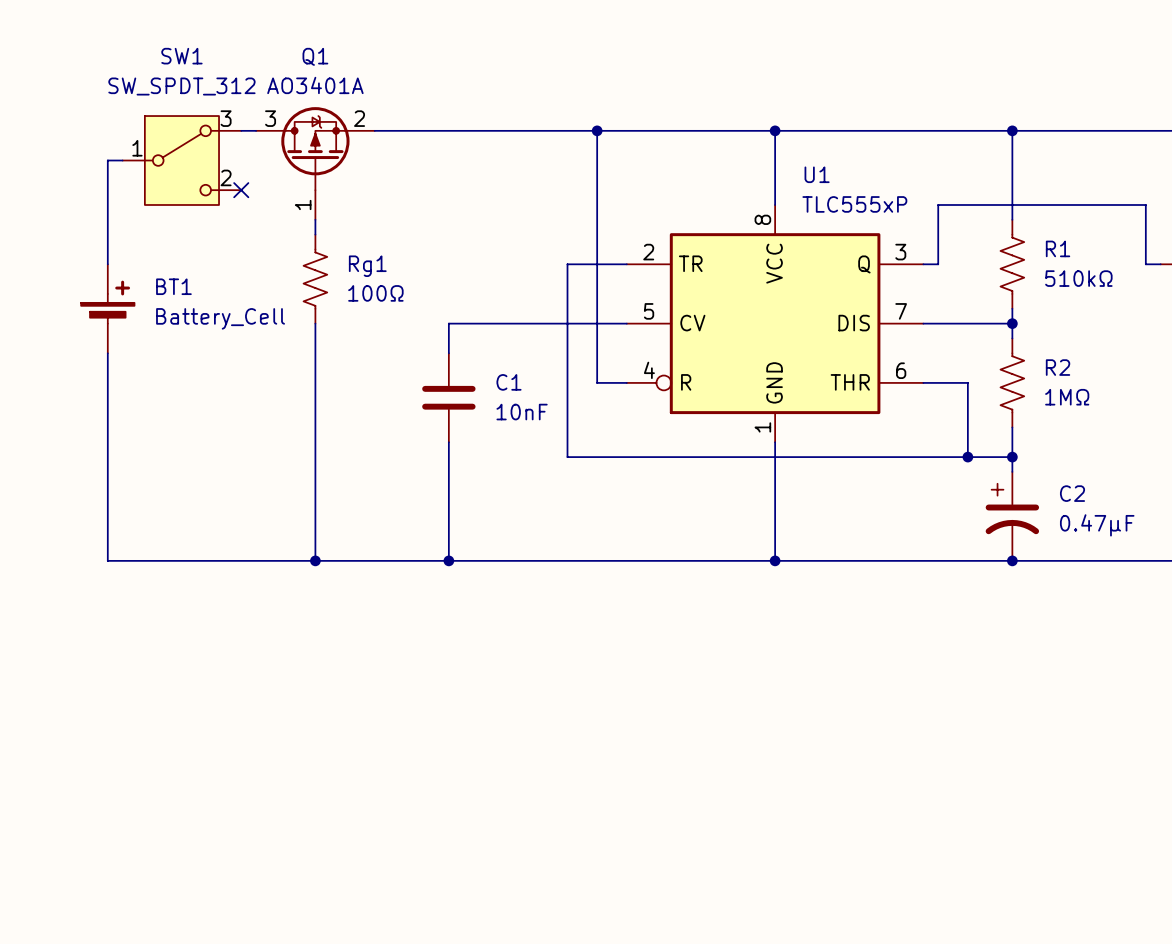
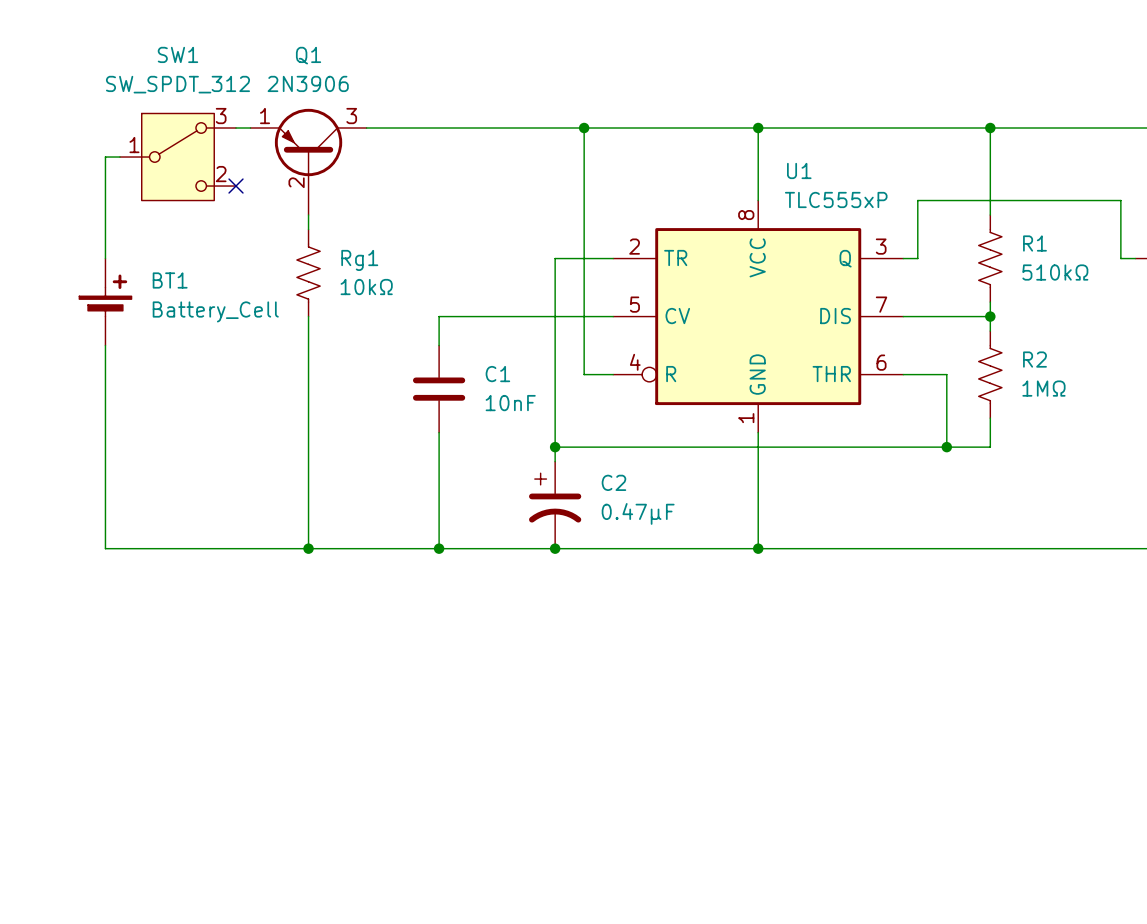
Q1 value: AO3401A (315, 85) -> 2N3906 (308, 83)
Q1 symbol: [256, 107, 375, 220] -> [250, 108, 367, 216]
Rg1 value: 100Ω (375, 293) -> 10kΩ (366, 287)
wire: none -> (555, 447) (555, 461)
junction: none -> (555, 447)
wire: (1012, 457) (1012, 471) -> none
junction: (1012, 457) -> none
C2 position: (1012, 516) -> (555, 505)
junction: none -> (555, 548)
junction: (1012, 560) -> none

